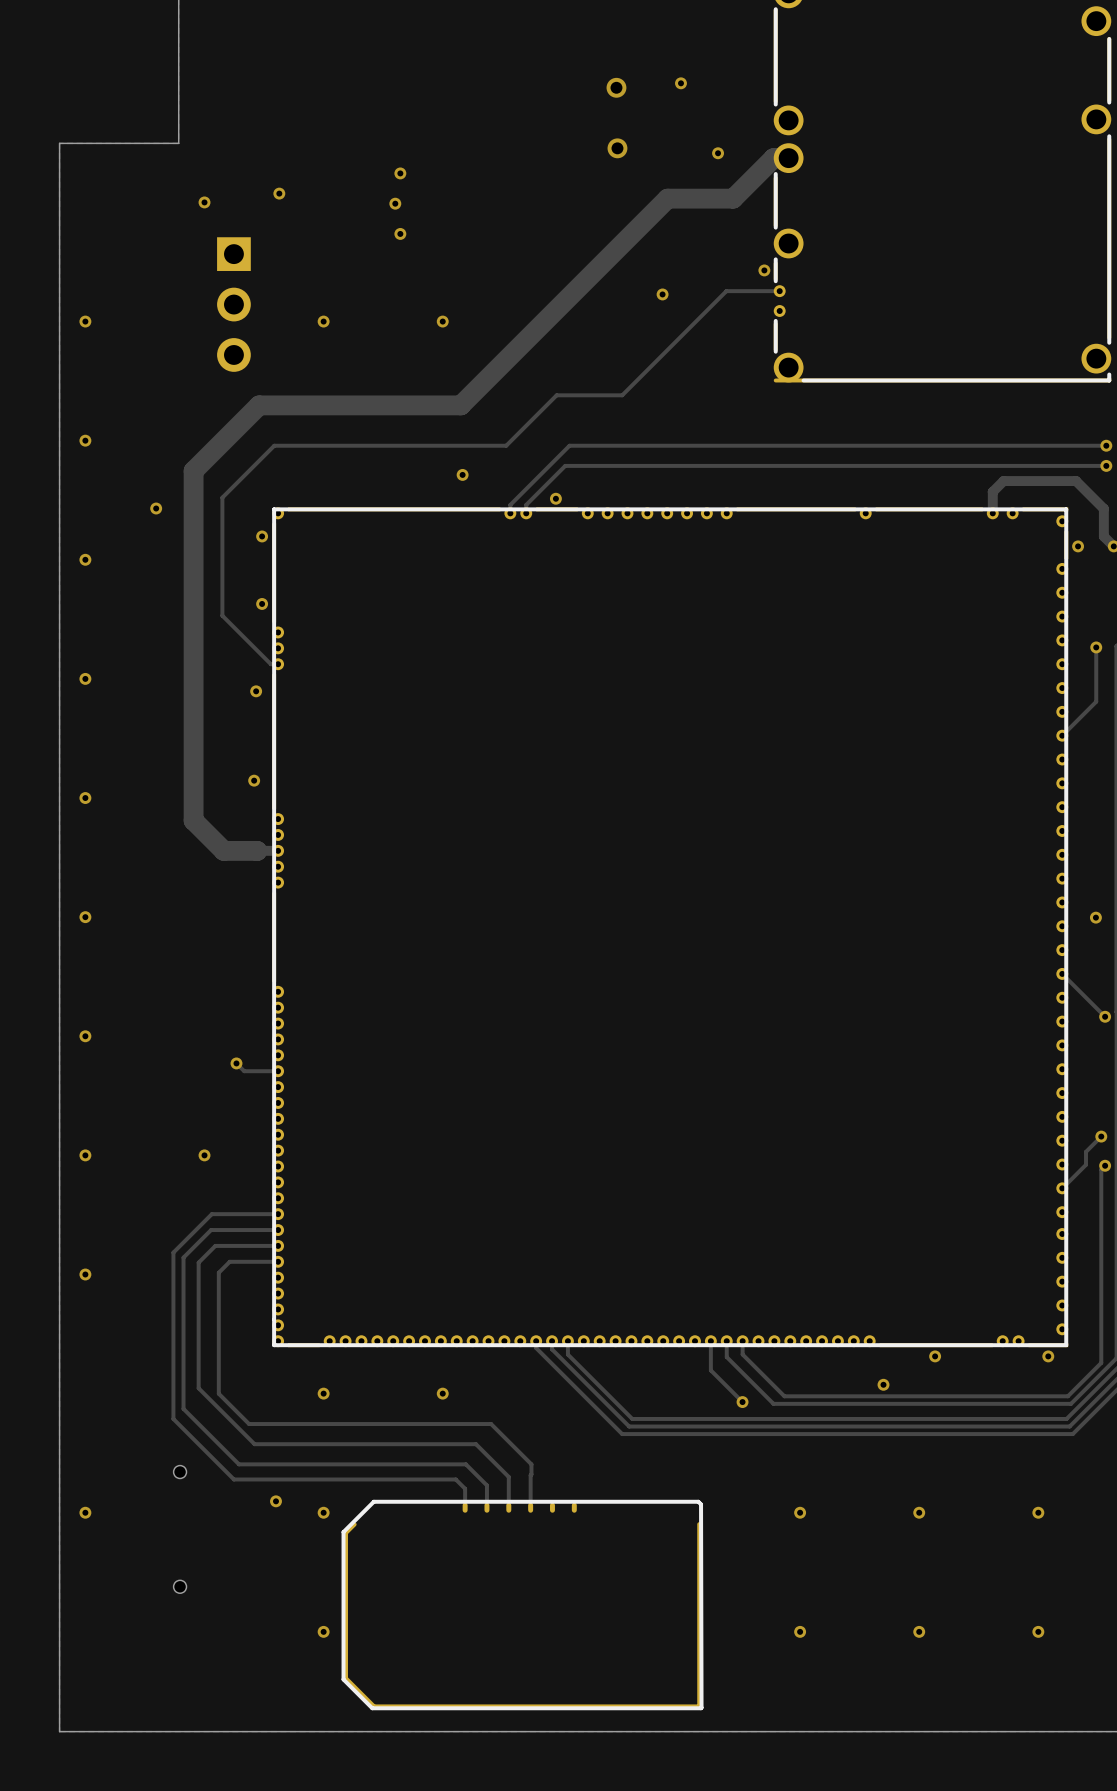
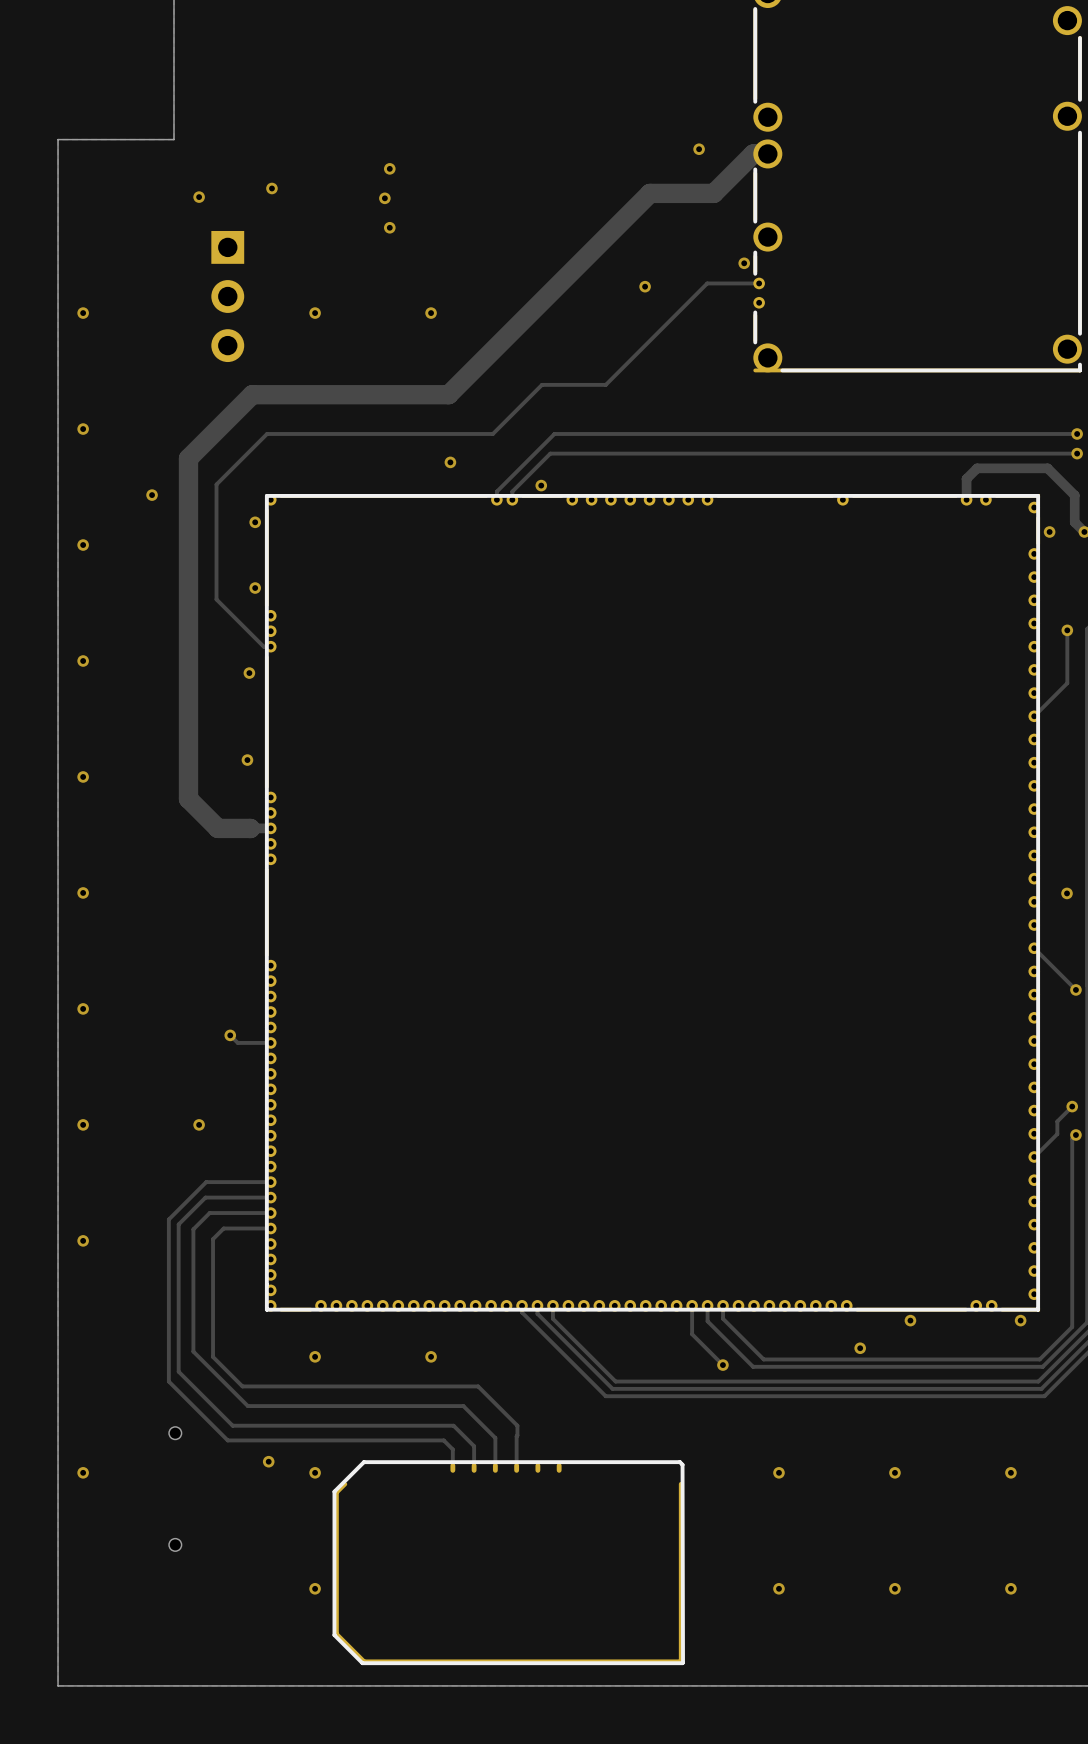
via: (680, 83) -> none
via: (616, 87) -> none
via: (617, 148) -> none

